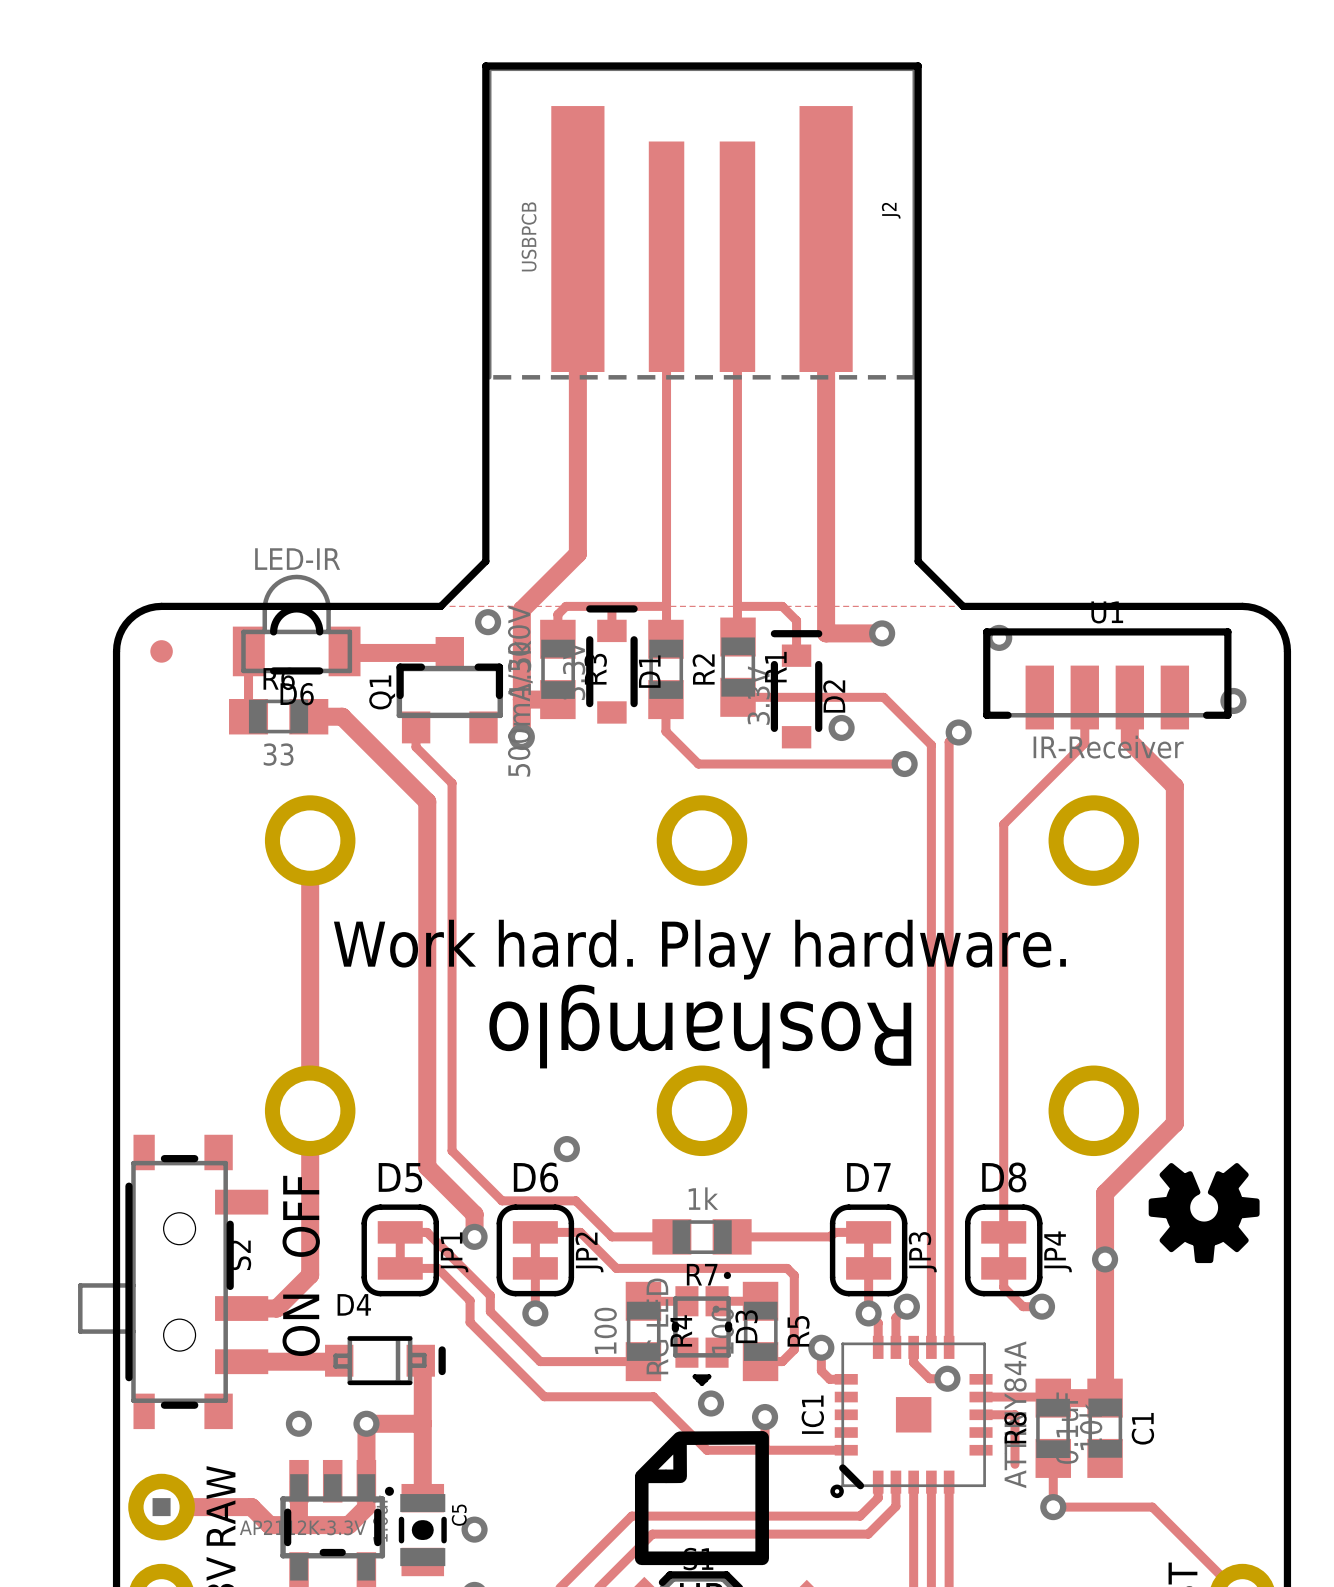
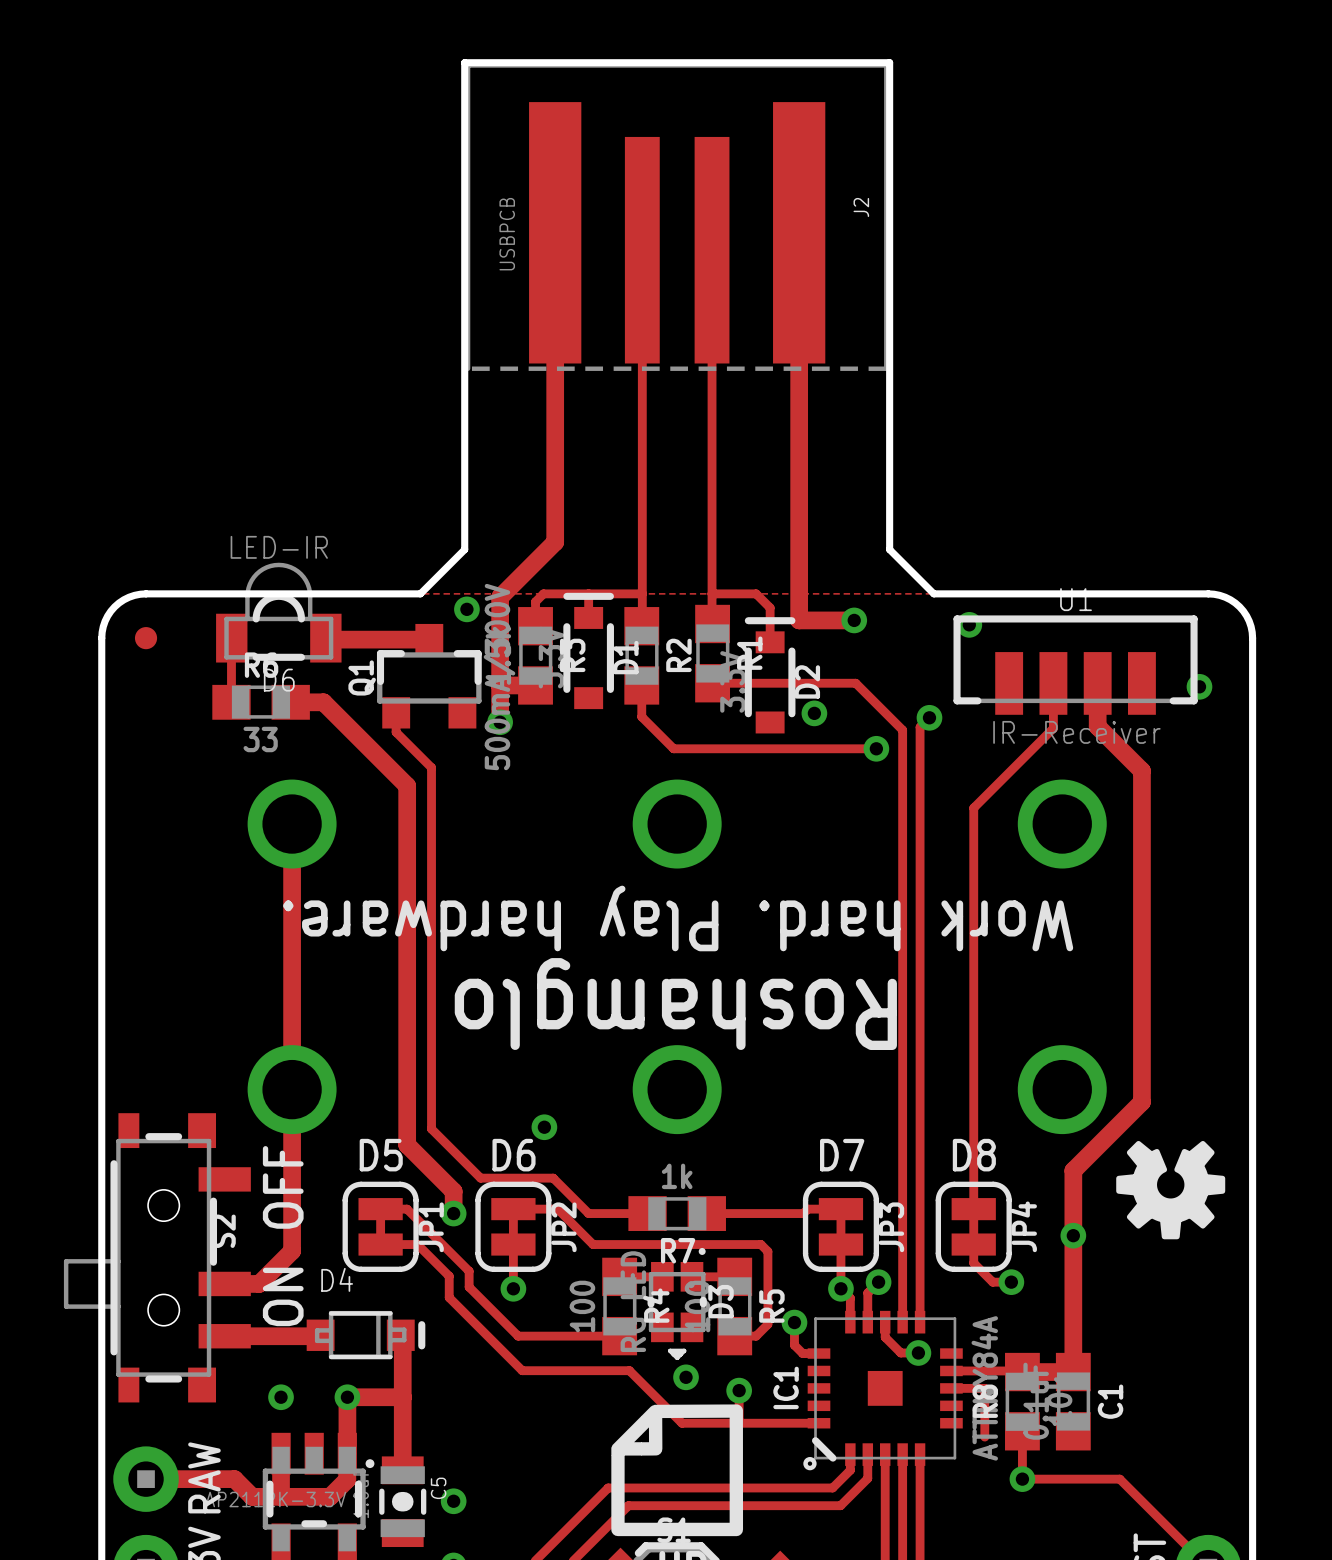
text rotation: 0° (699, 949) -> 180° (678, 918)

